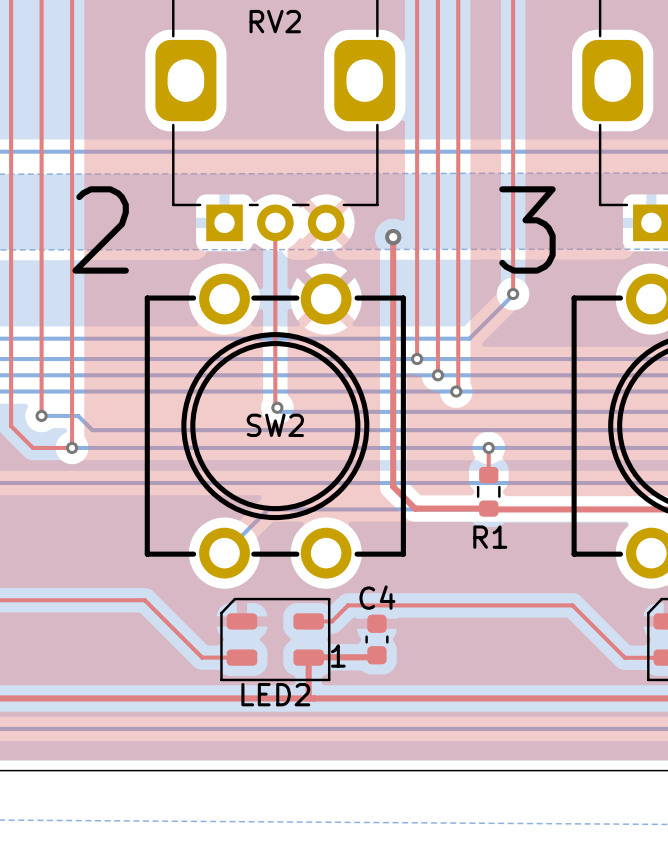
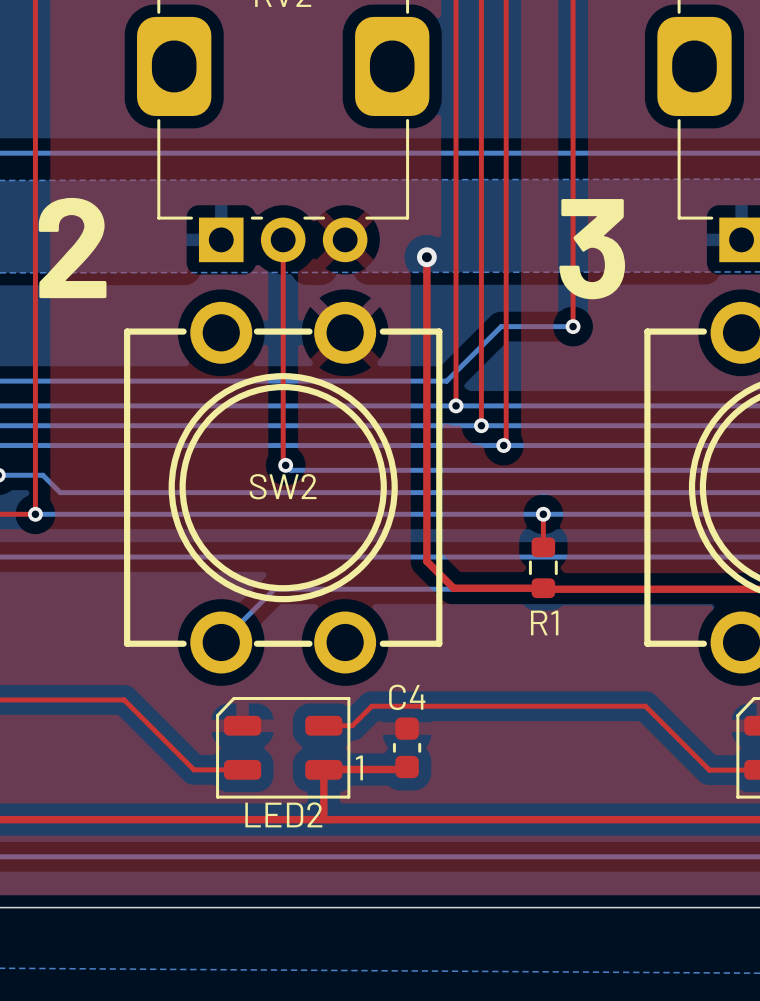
bottom track: (513, 293) (469, 338) (409, 338) -> (573, 326) (501, 326) (446, 381)

